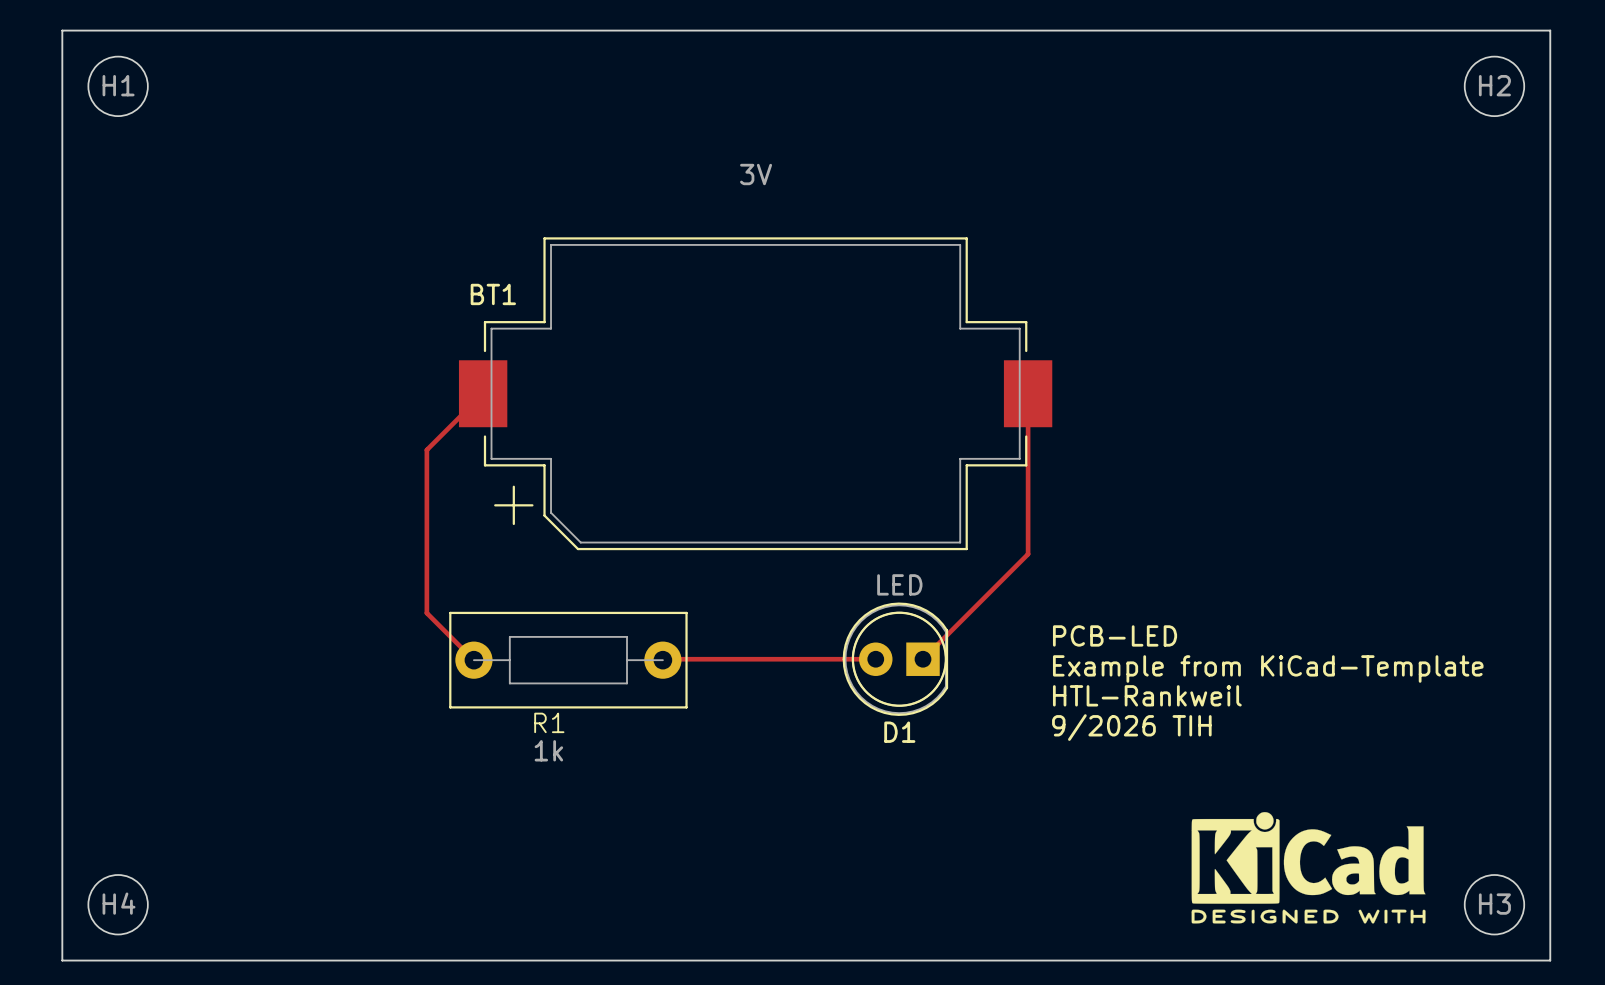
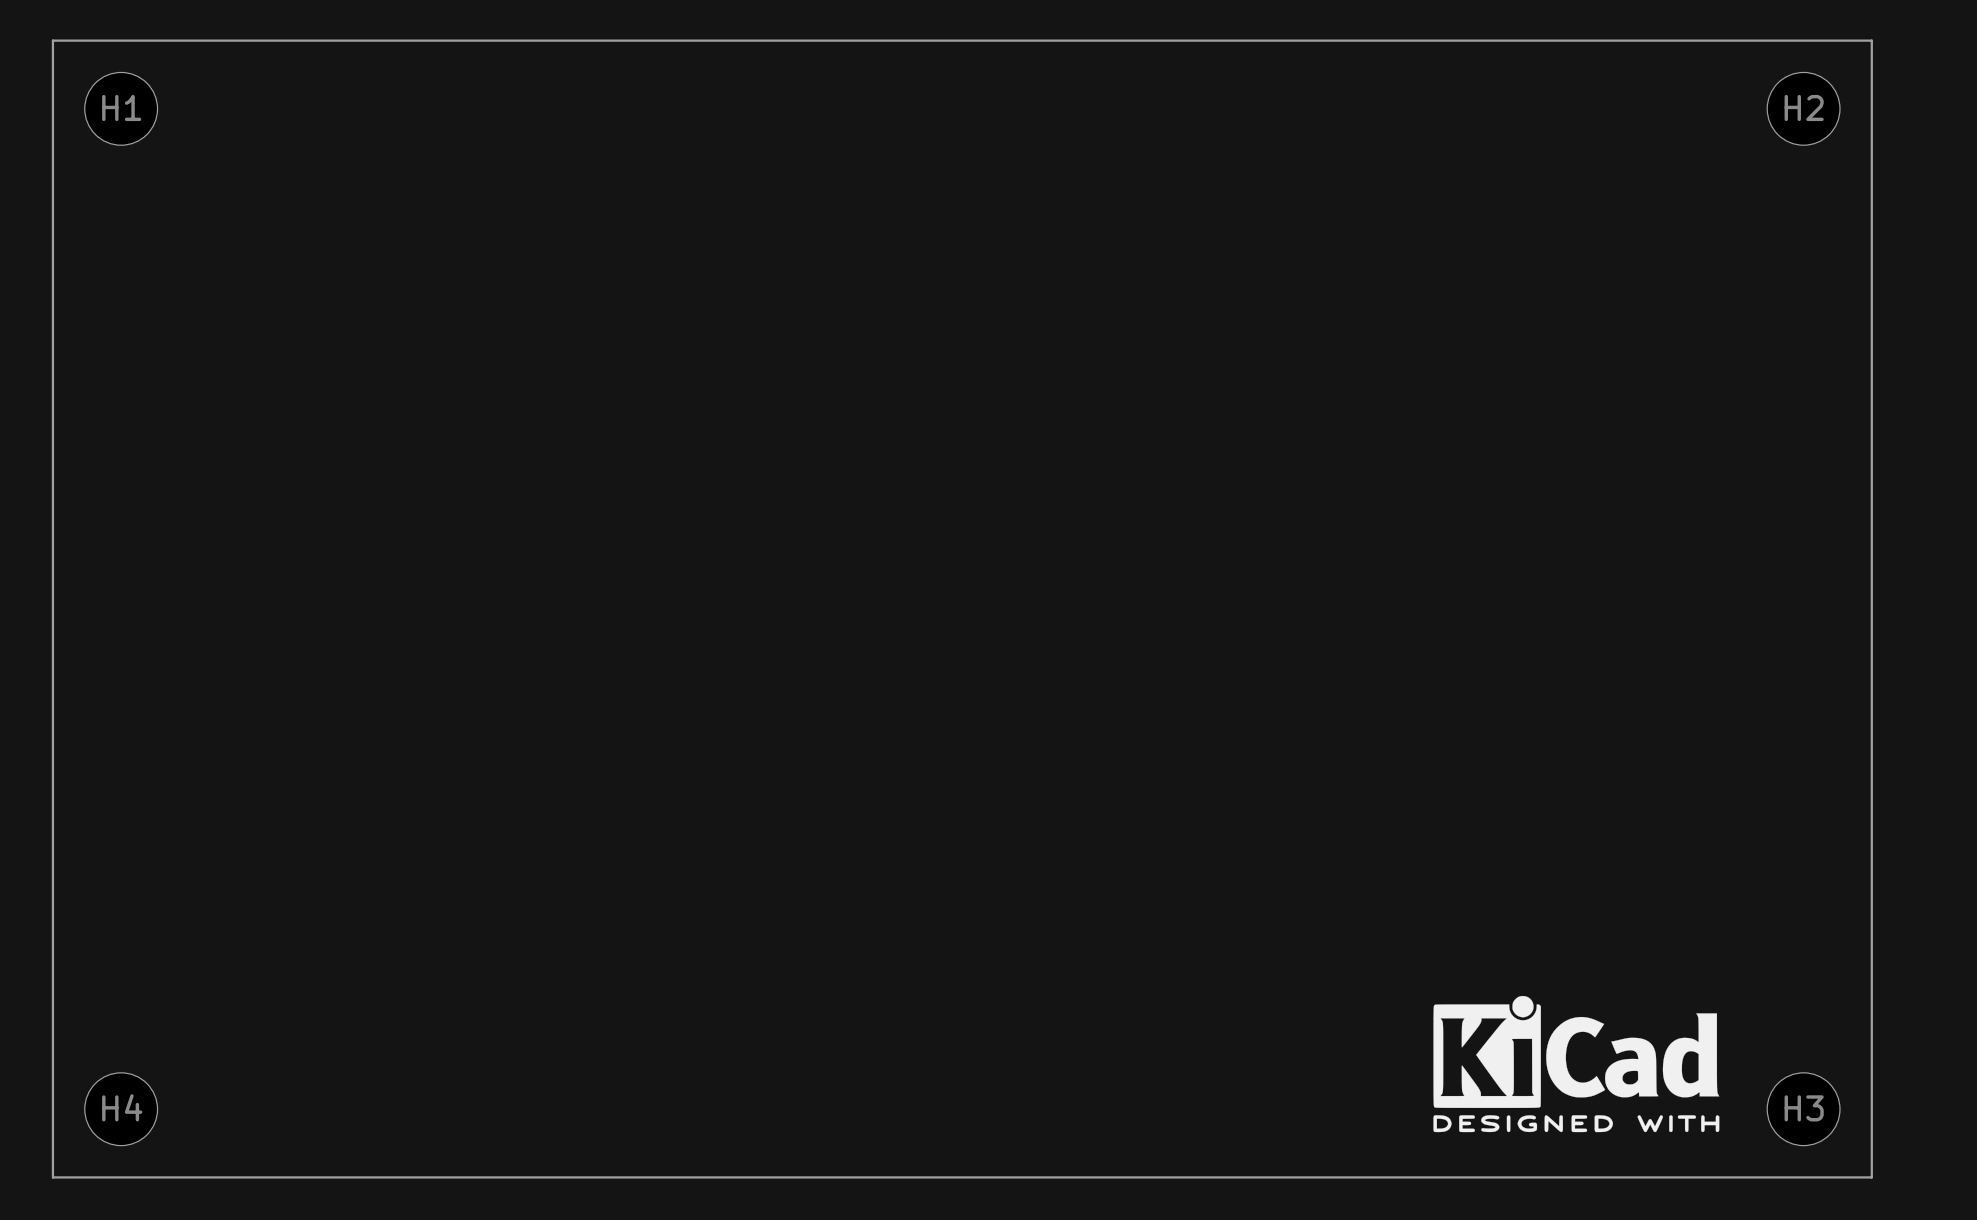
track: (483, 393) (426, 450) (426, 613) (473, 660) -> none
BT1: 3V (755, 393) -> none
track: (1028, 393) (1028, 554) (923, 659) -> none
text: PCB-LED (1115, 635) -> none
track: (875, 659) (662, 660) -> none
D1: LED (895, 659) -> none
R1: 1k (568, 660) -> none
text: Example from KiCad-Template (1268, 668) -> none
text: HTL-Rankweil (1147, 695) -> none
text: 9/2026 TIH (1131, 727) -> none

